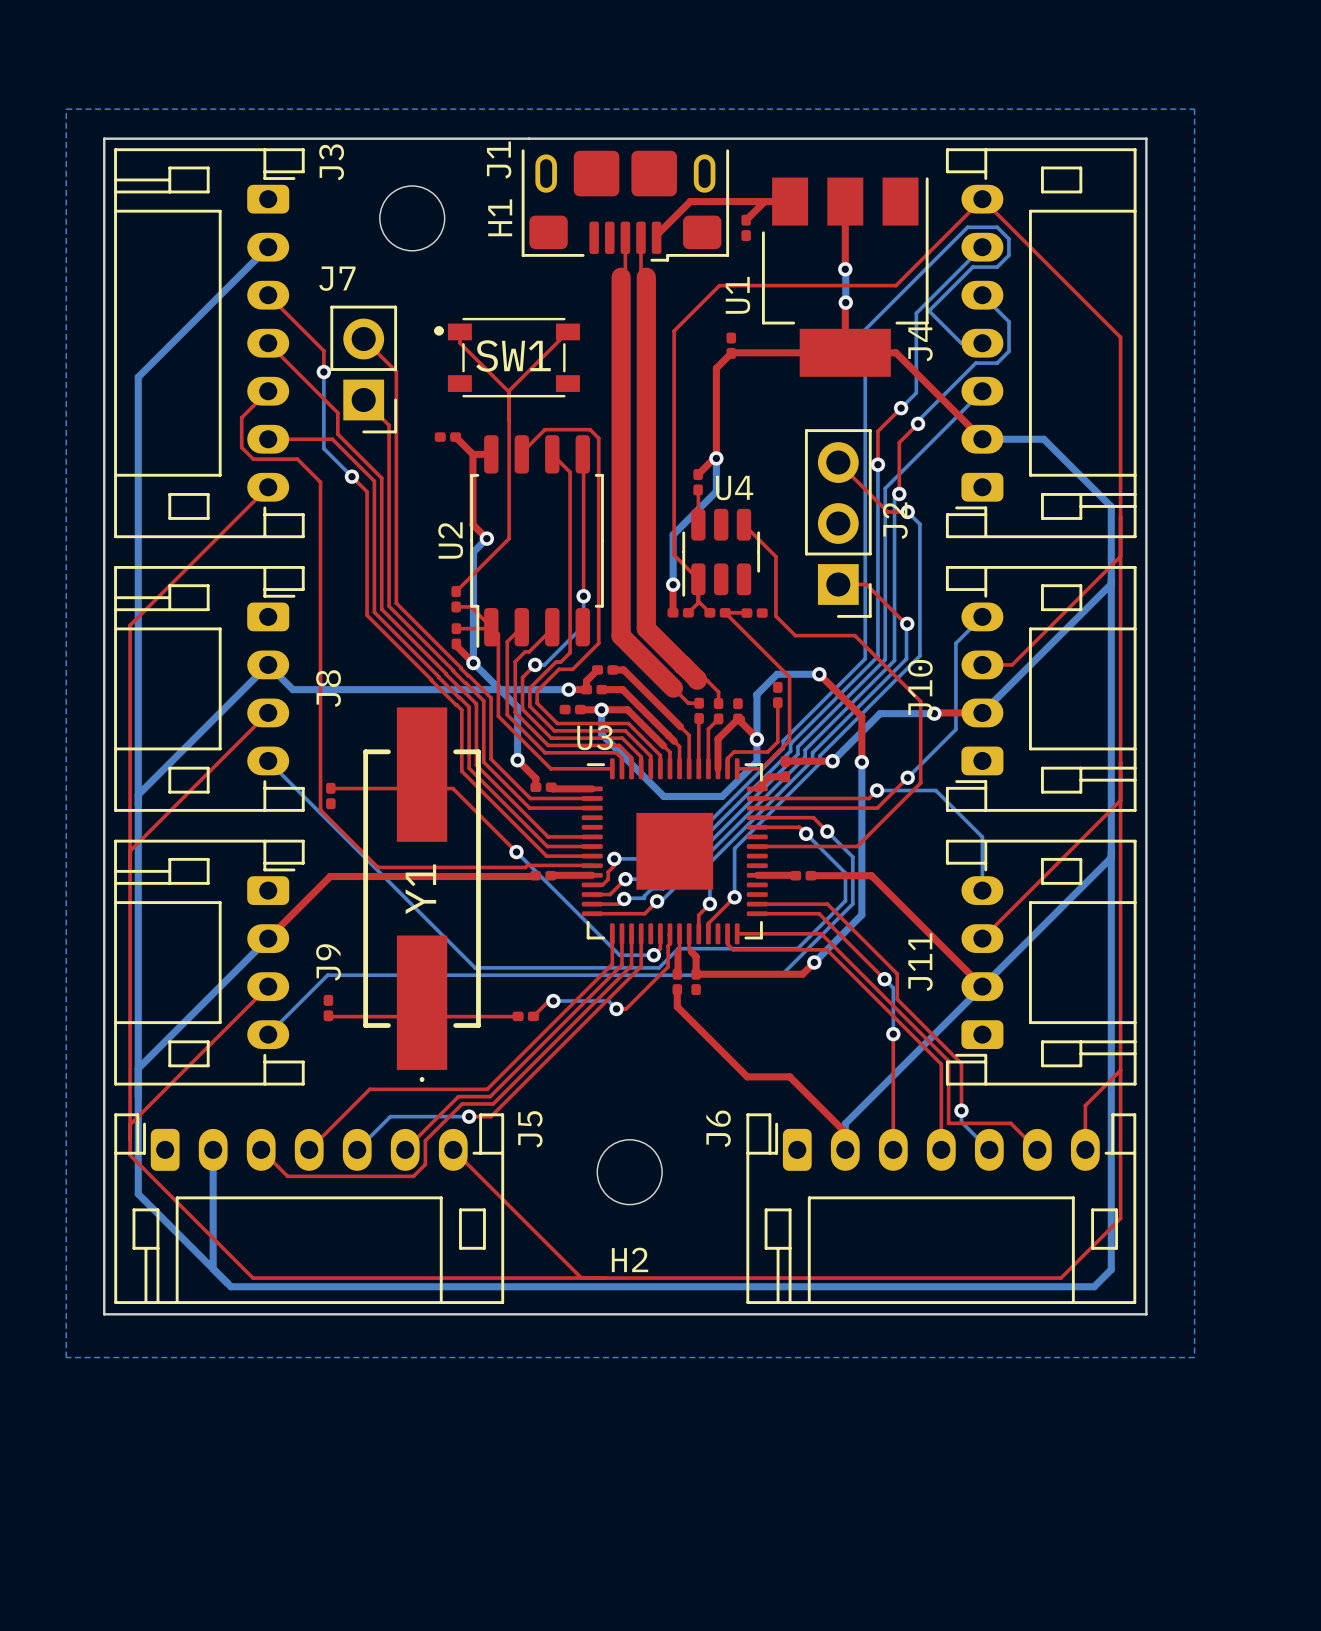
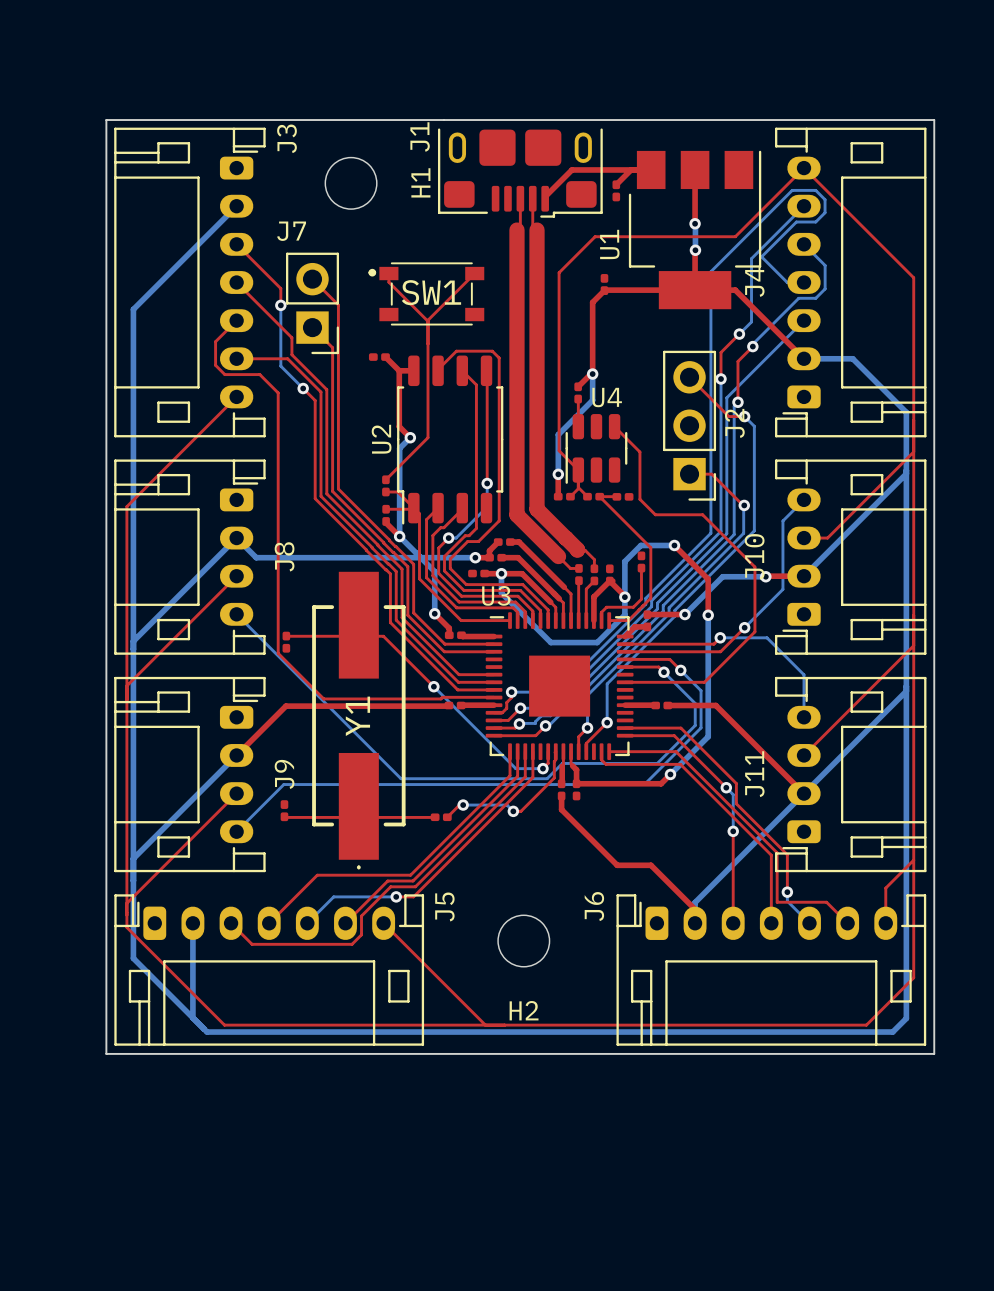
bottom zone outline: (66, 109) (1194, 109) (1194, 1357) (66, 1357) (66, 109) -> none

